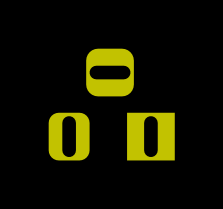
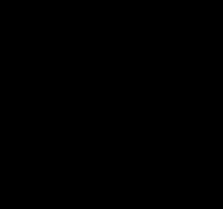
part: (111, 104) -> none

